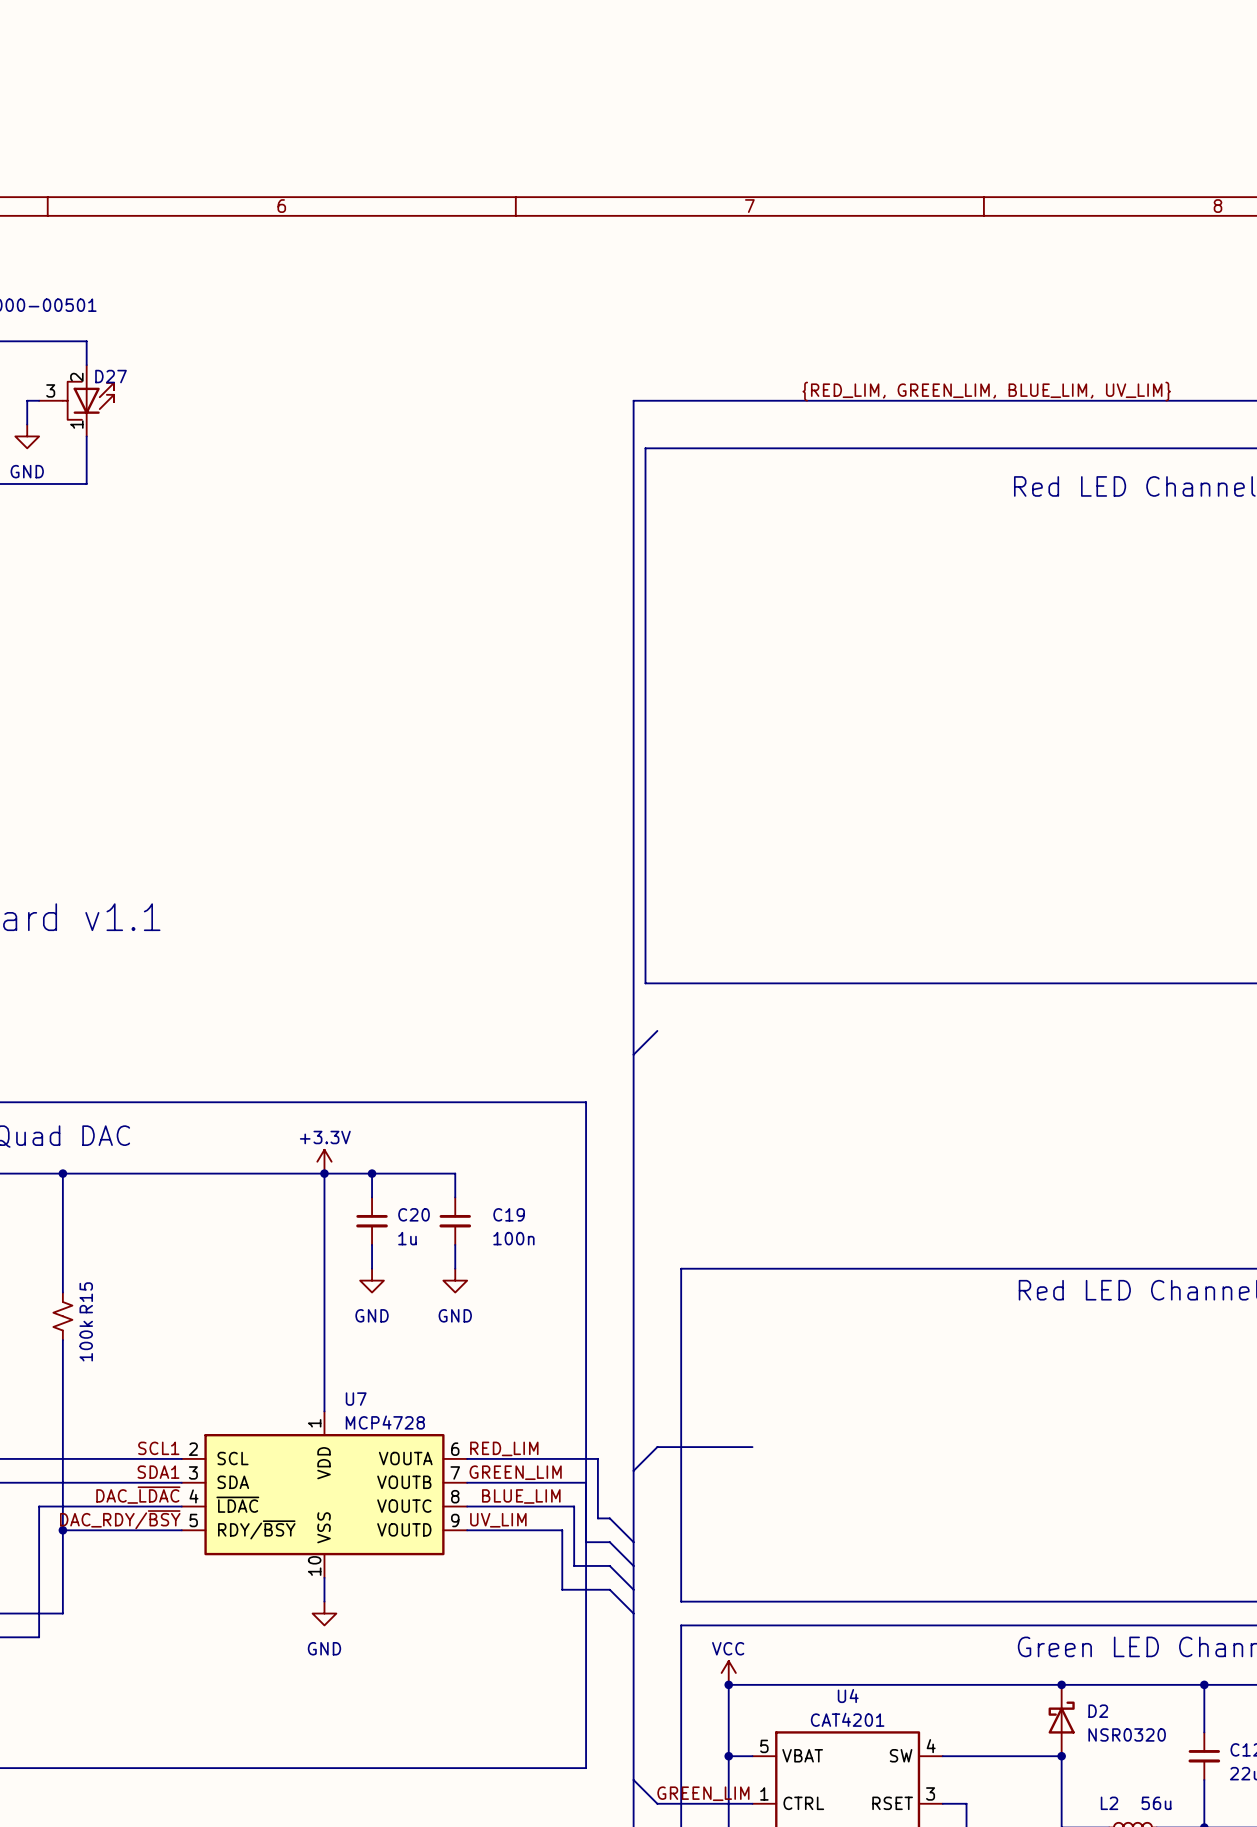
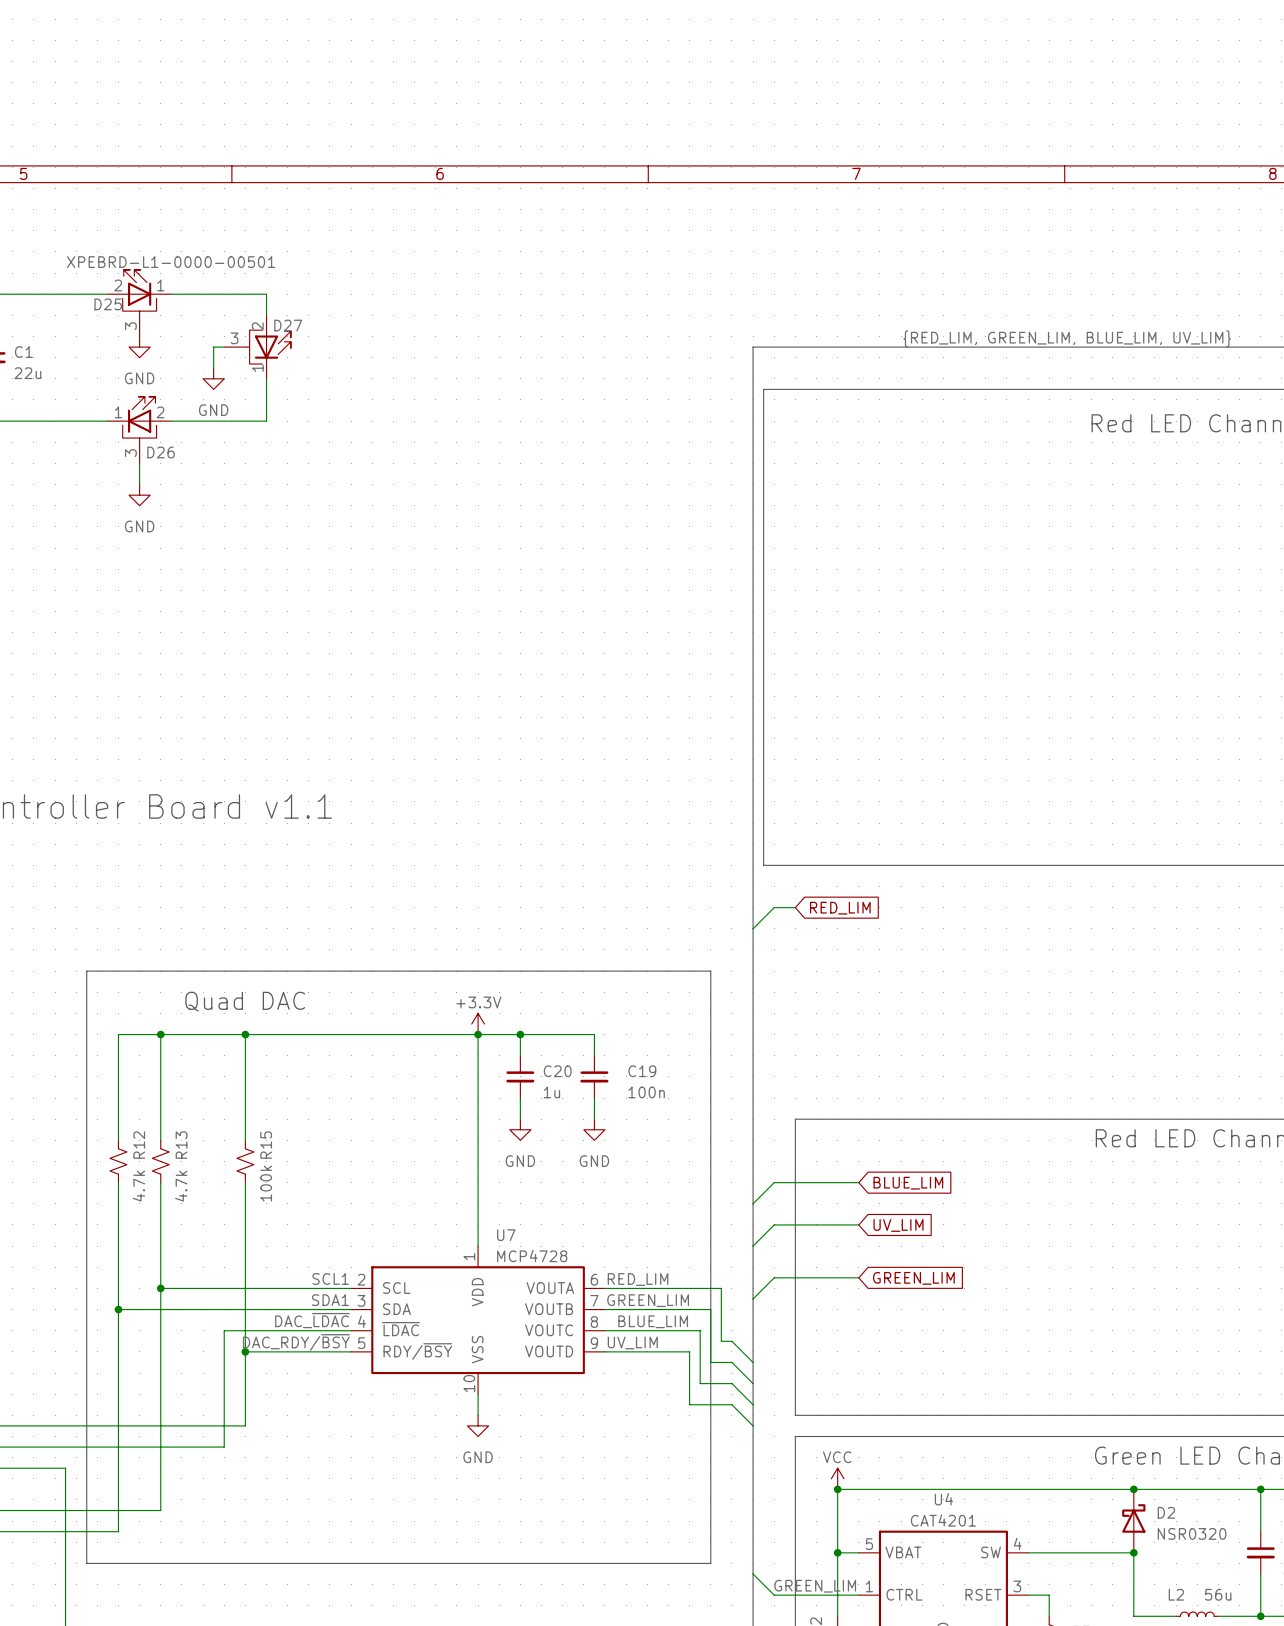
wire: none -> (774, 907) (795, 907)
global label: none -> RED_LIM (840, 908)
wire: none -> (858, 1182) (774, 1182) (753, 1203)
global label: none -> BLUE_LIM (908, 1183)
wire: none -> (858, 1224) (774, 1224) (753, 1246)
global label: none -> UV_LIM (898, 1225)
global label: none -> GREEN_LIM (913, 1278)

